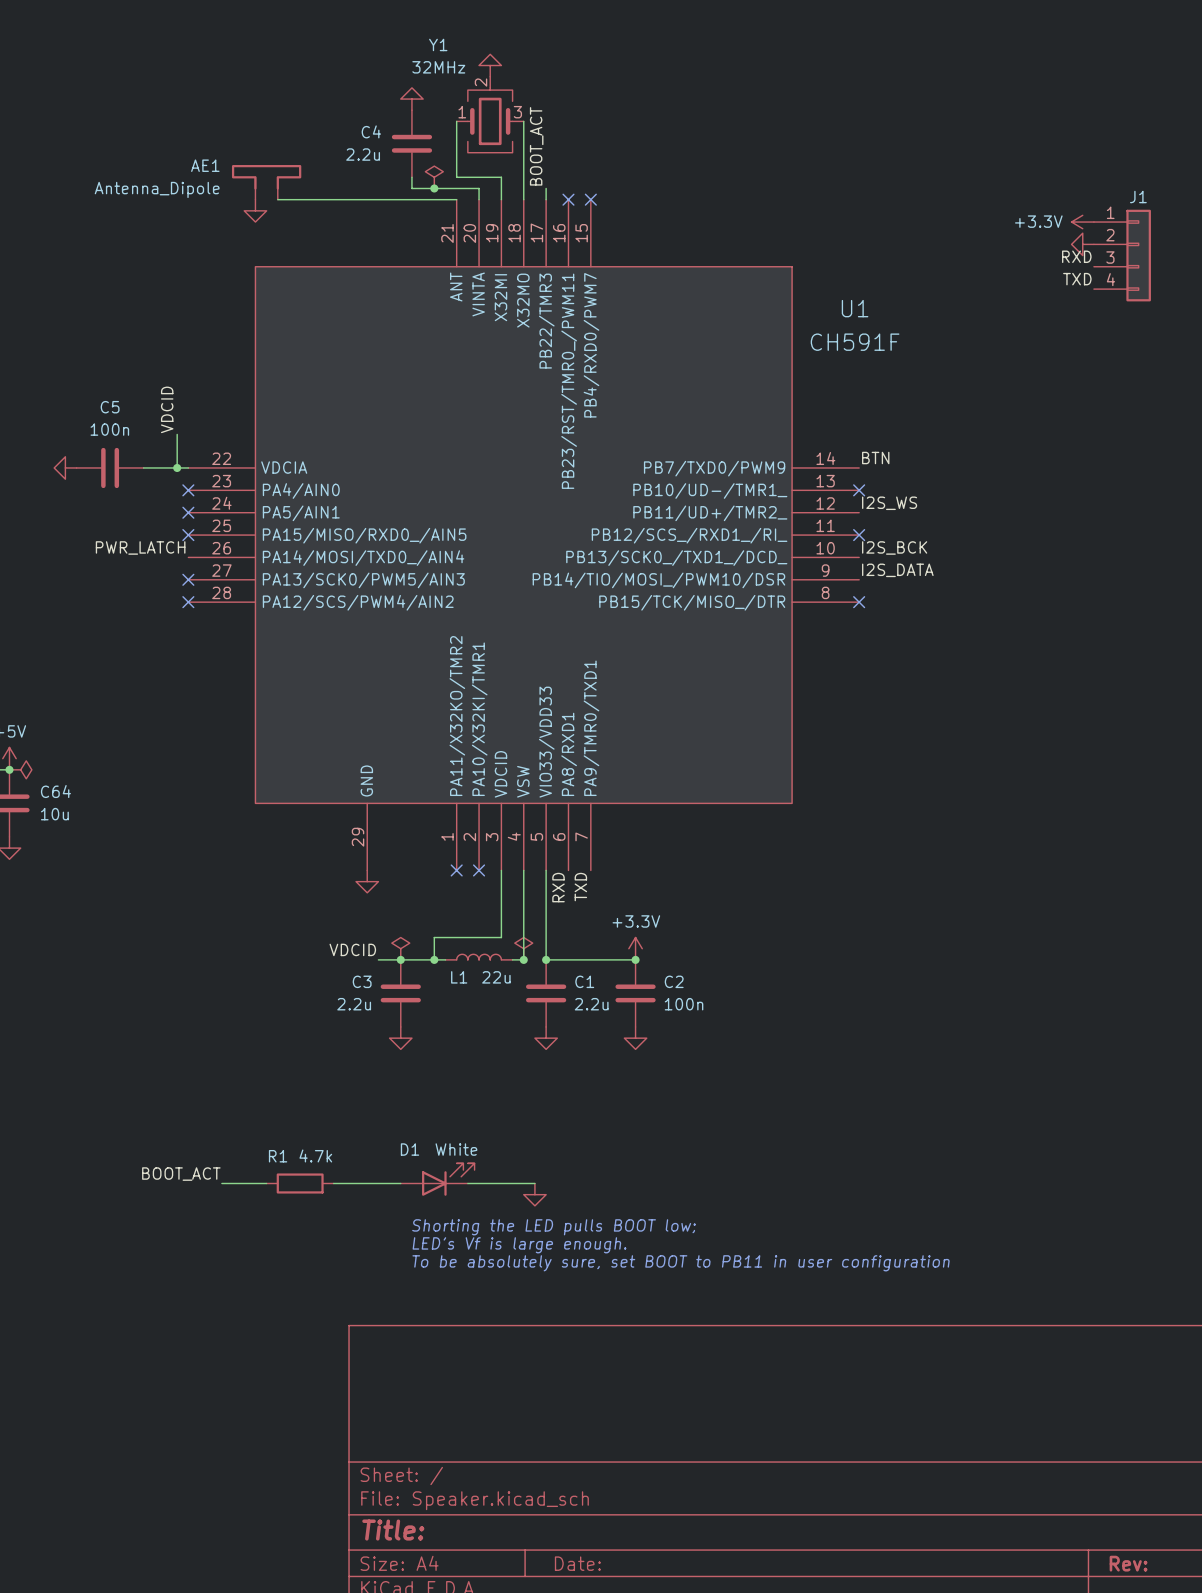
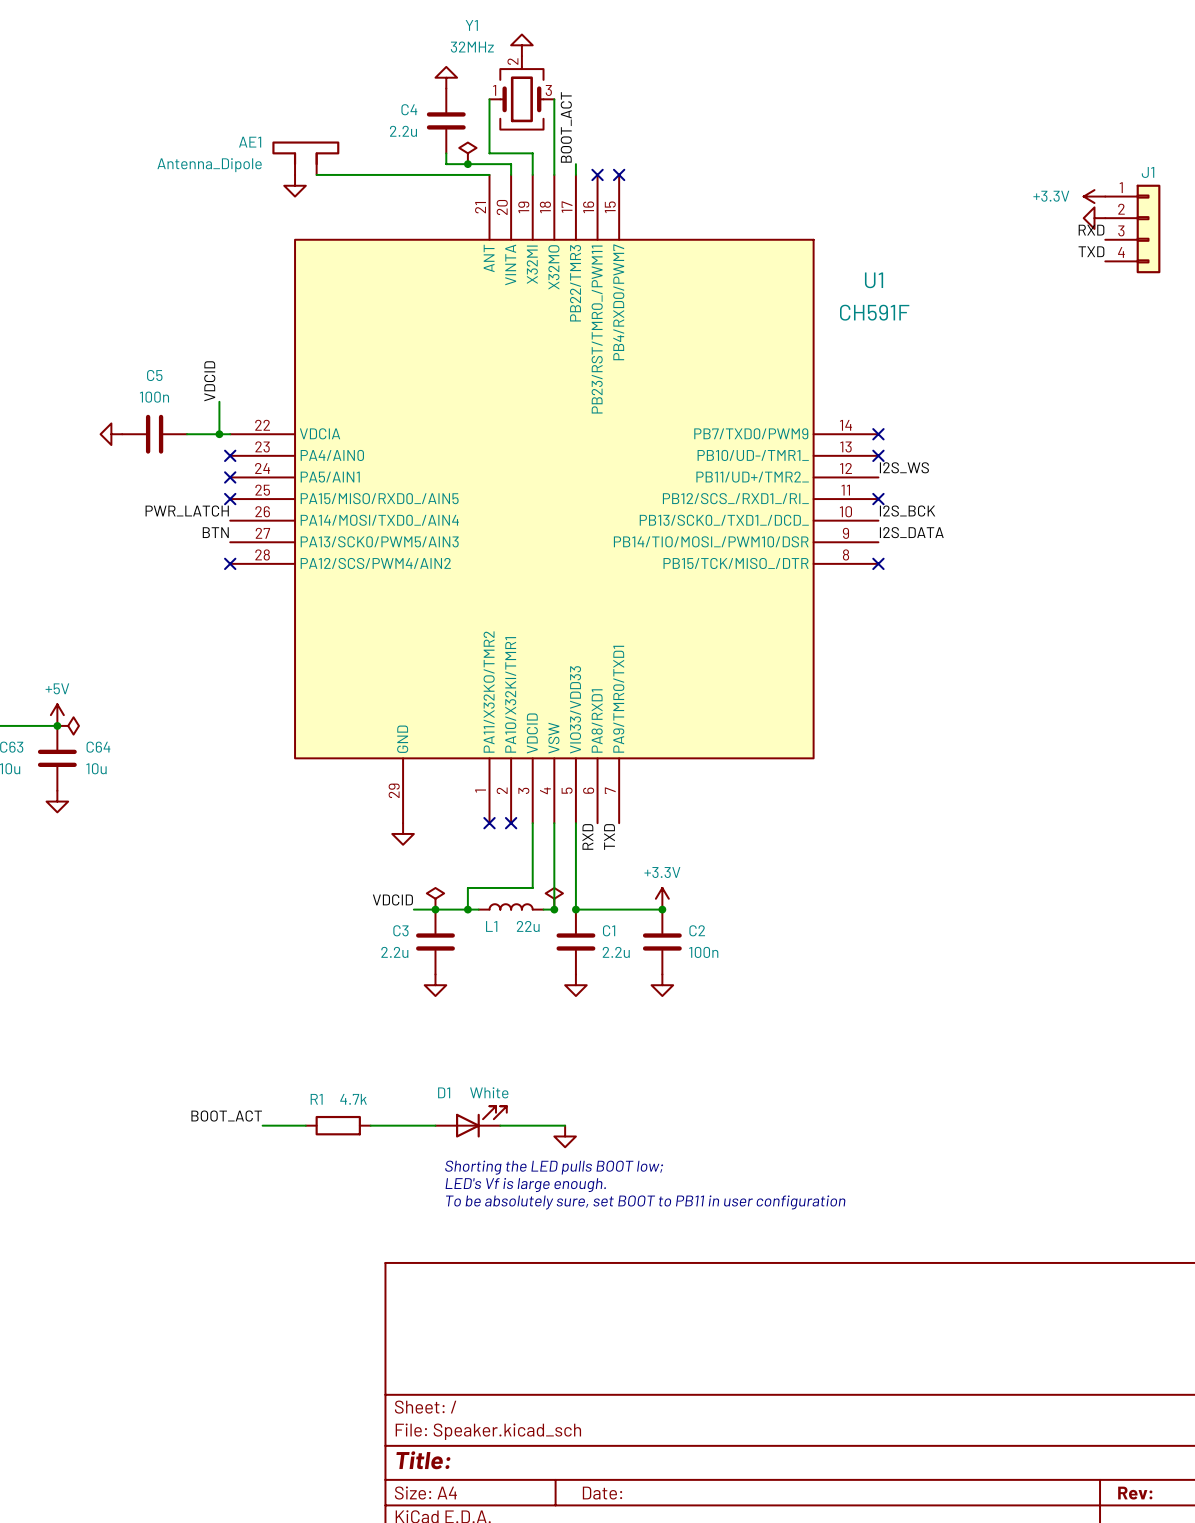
label: BTN (875, 458) -> none
no-connect mark: none -> (878, 434)
label: none -> BTN (215, 532)
no-connect mark: (188, 579) -> none

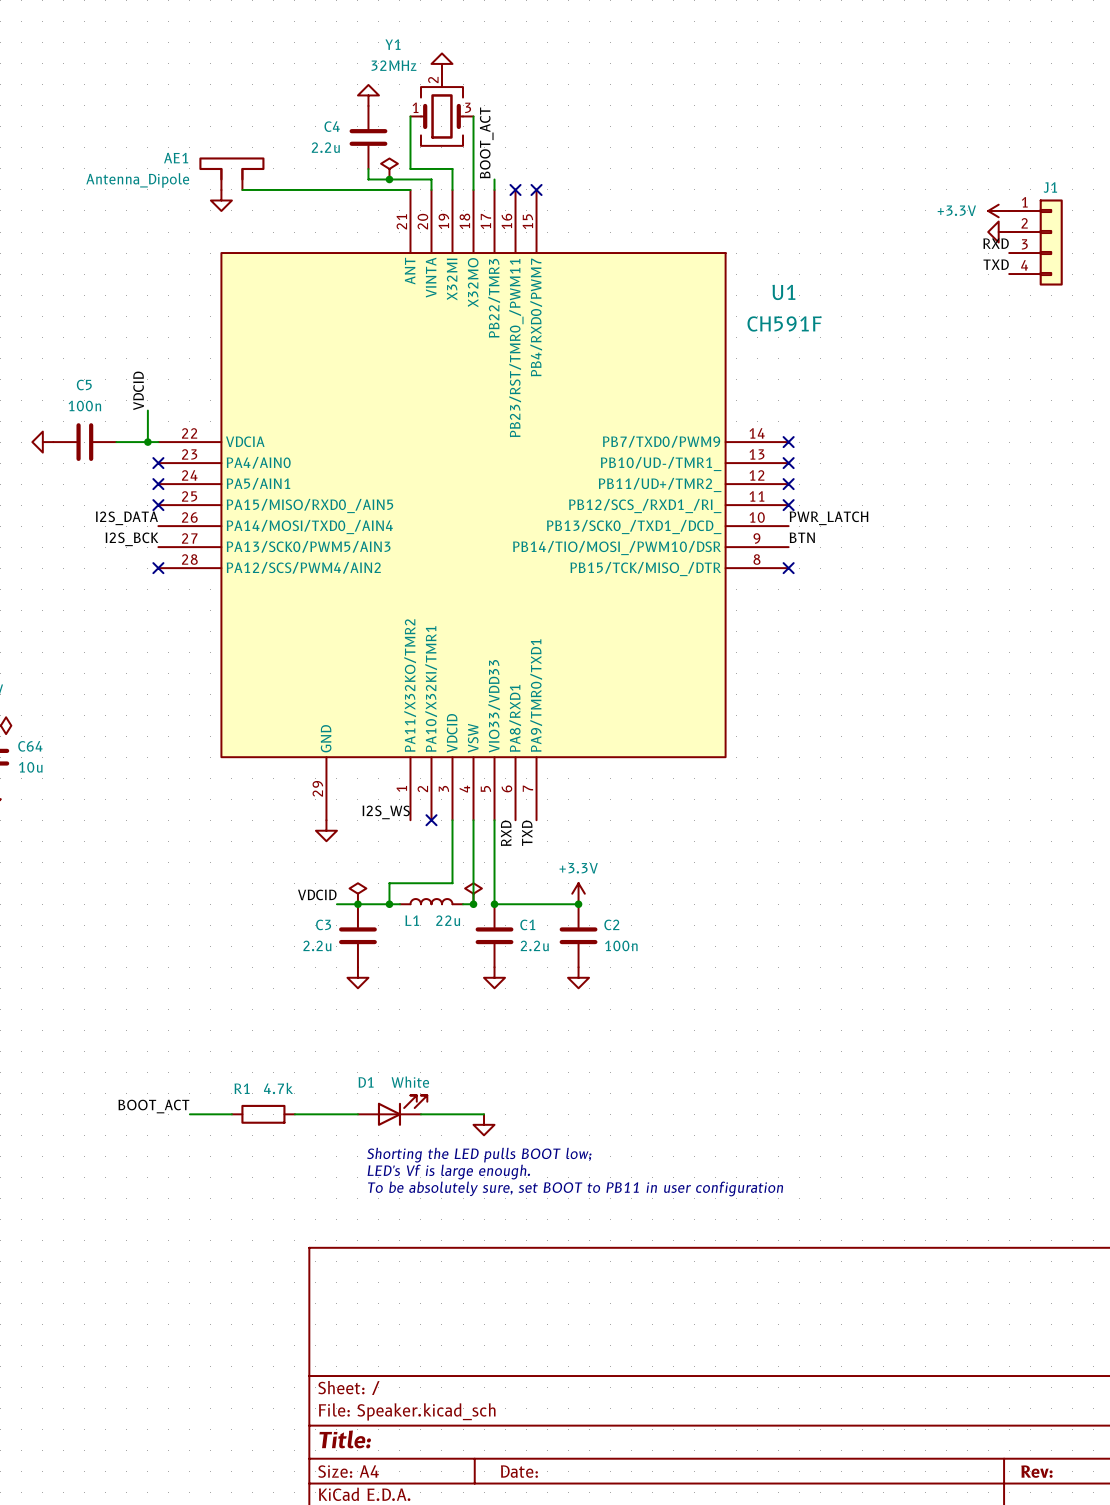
label: I2S_WS (904, 467) -> none
no-connect mark: none -> (788, 484)
label: PWR_LATCH (187, 511) -> I2S_DATA (126, 518)
label: I2S_BCK (907, 511) -> PWR_LATCH (828, 518)
label: BTN (215, 532) -> I2S_BCK (131, 539)
label: I2S_DATA (911, 532) -> BTN (802, 537)
label: none -> I2S_WS (386, 812)
no-connect mark: (489, 823) -> none

